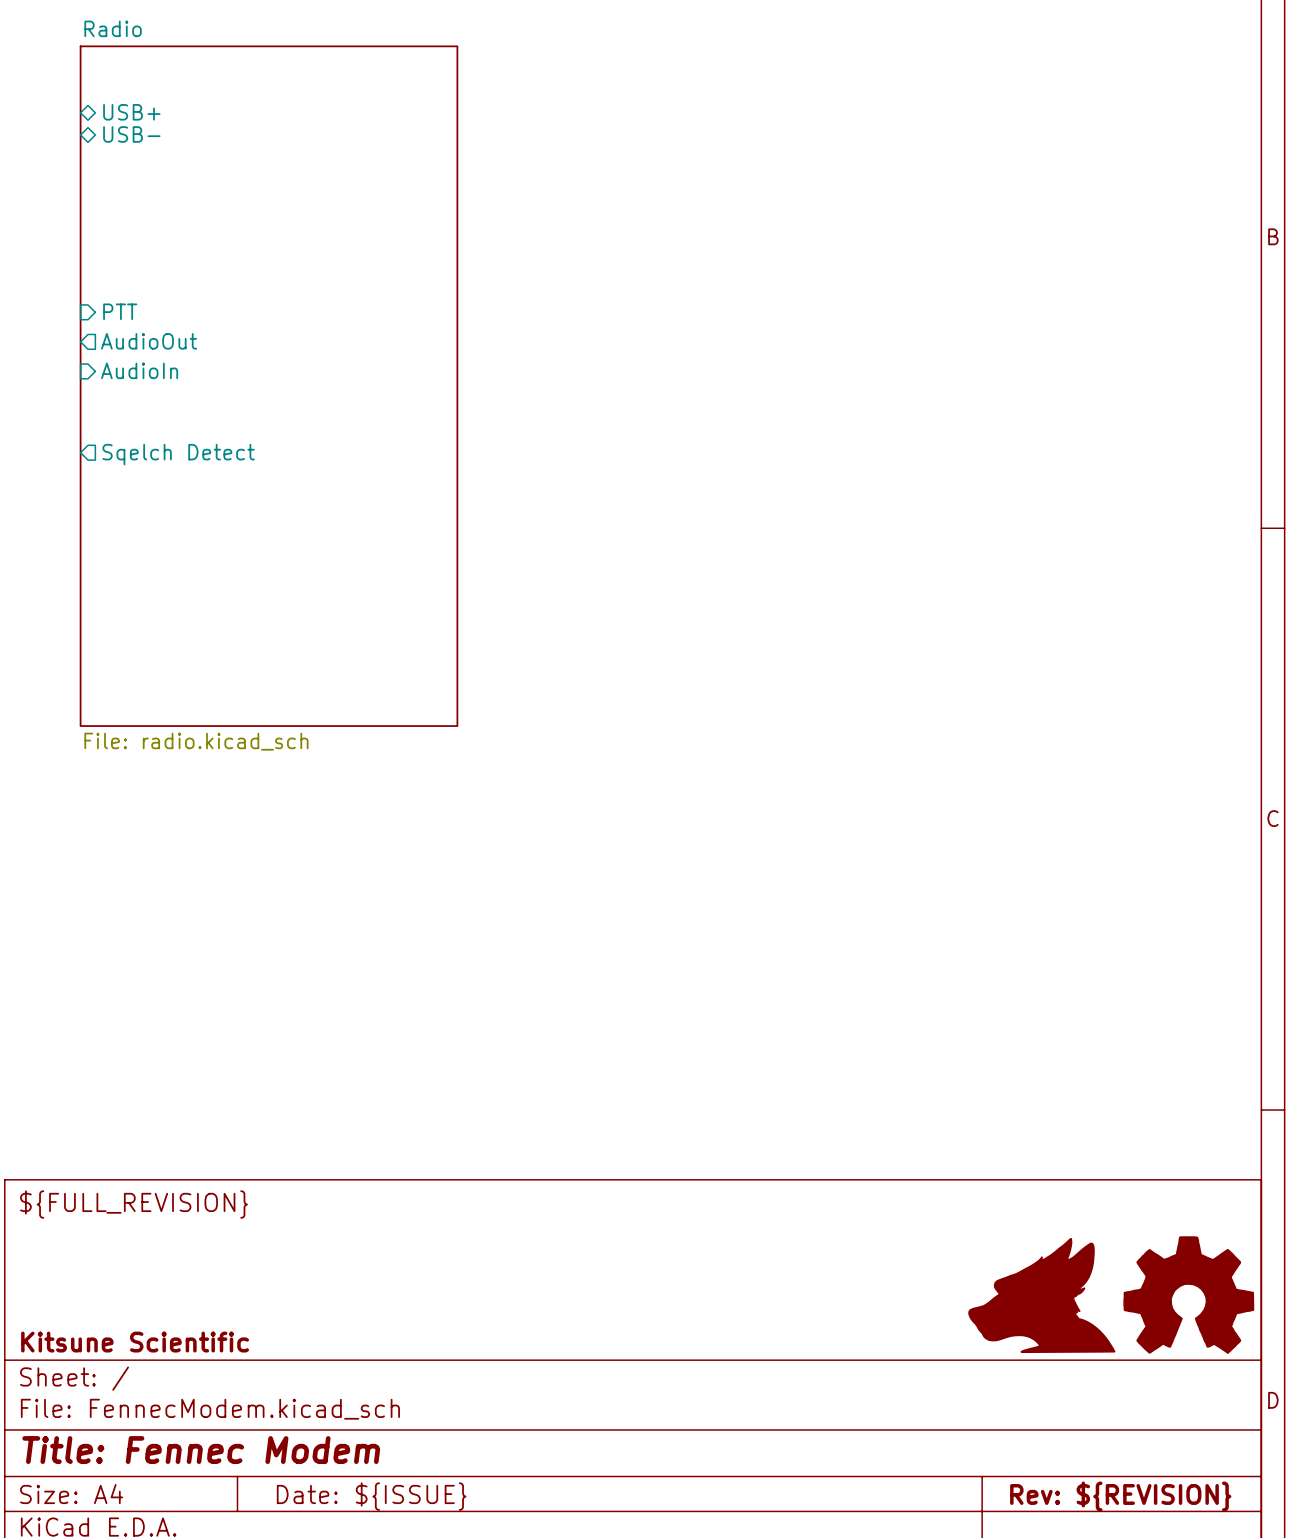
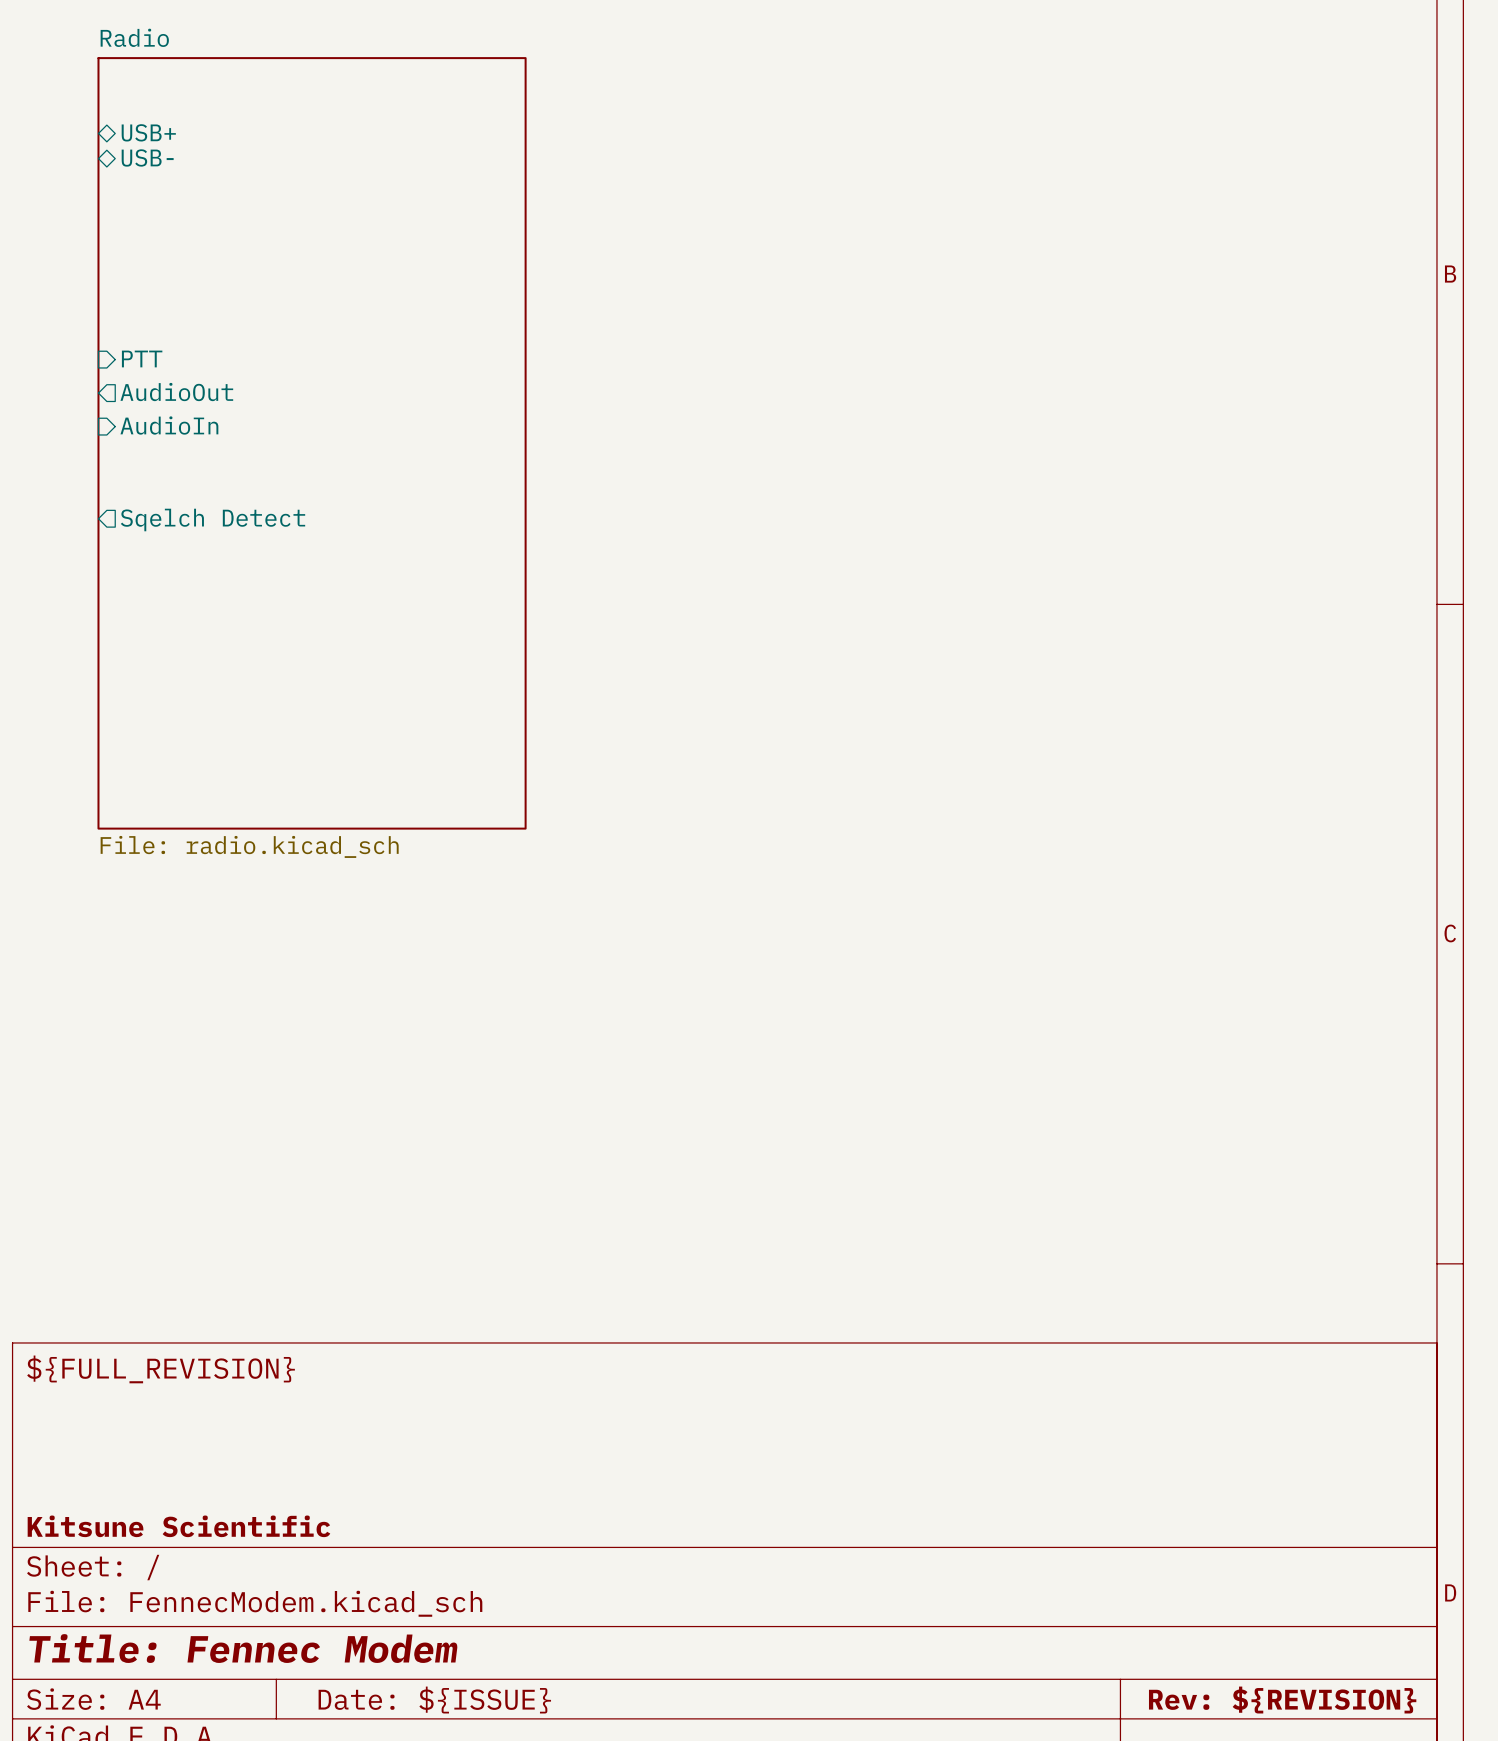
power symbol: (1188, 1294) -> none
power symbol: (1041, 1295) -> none

